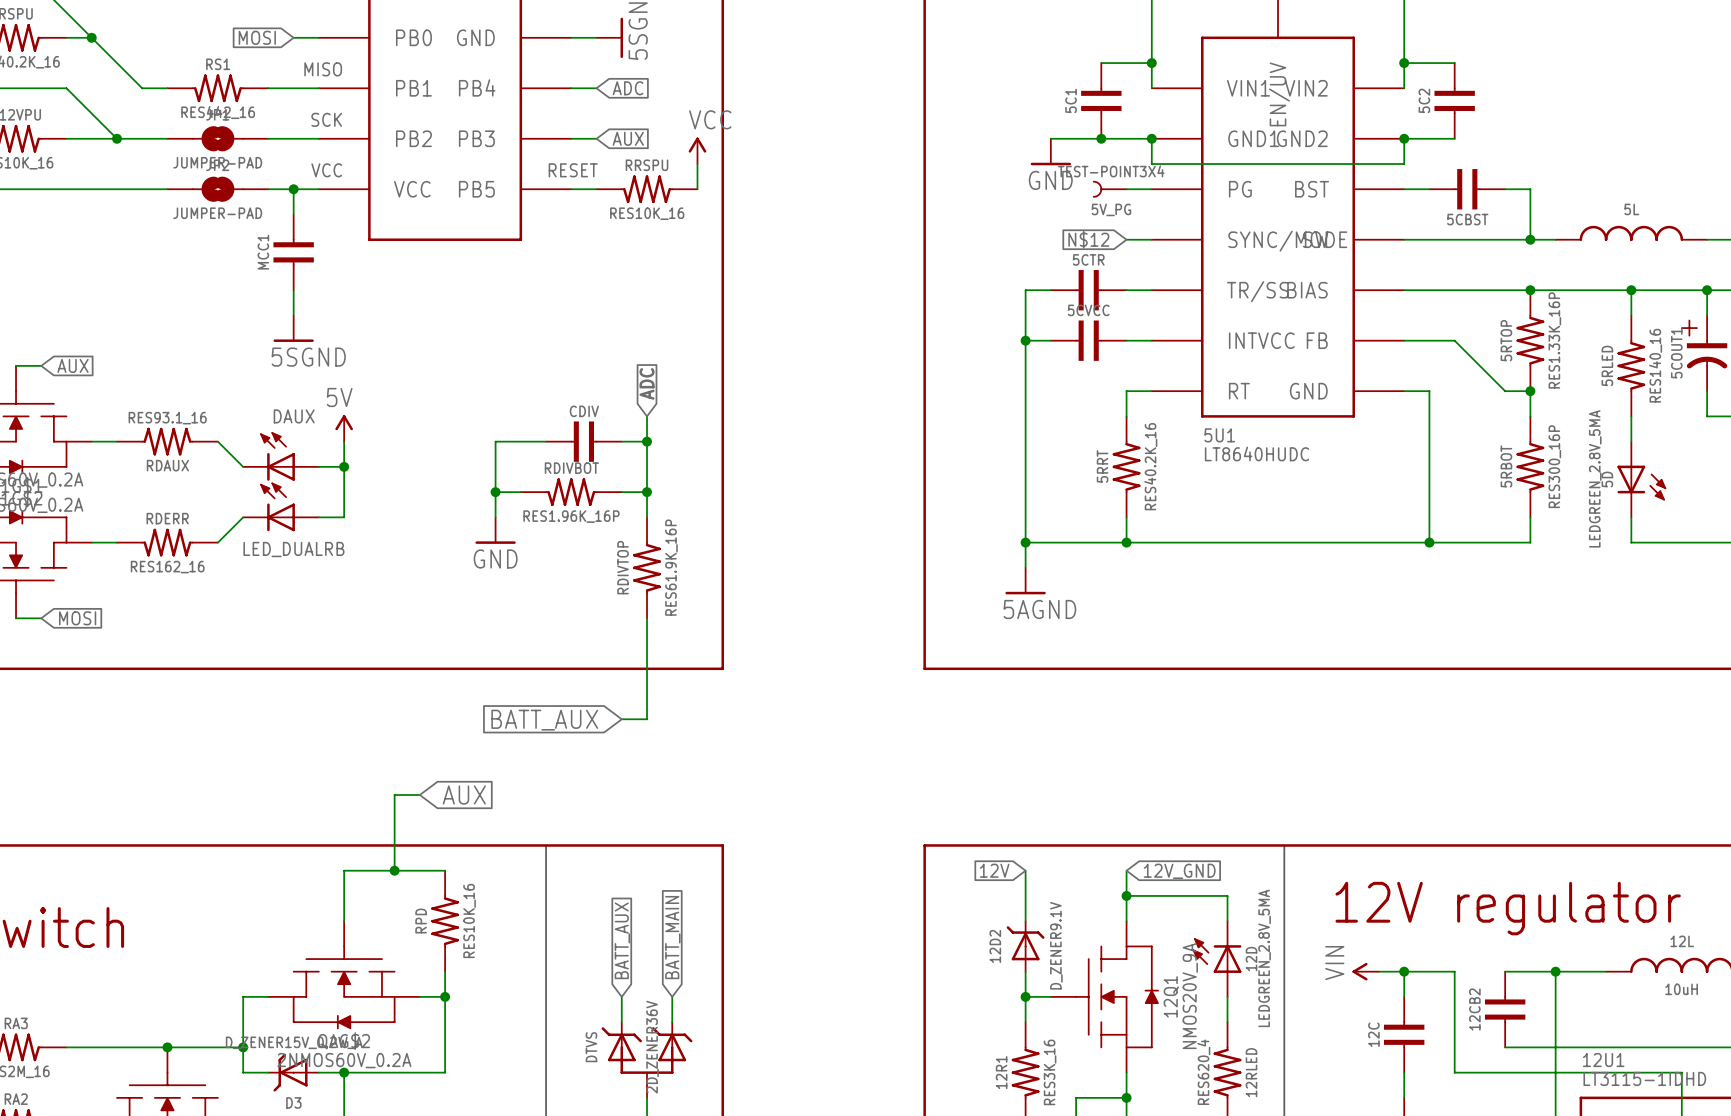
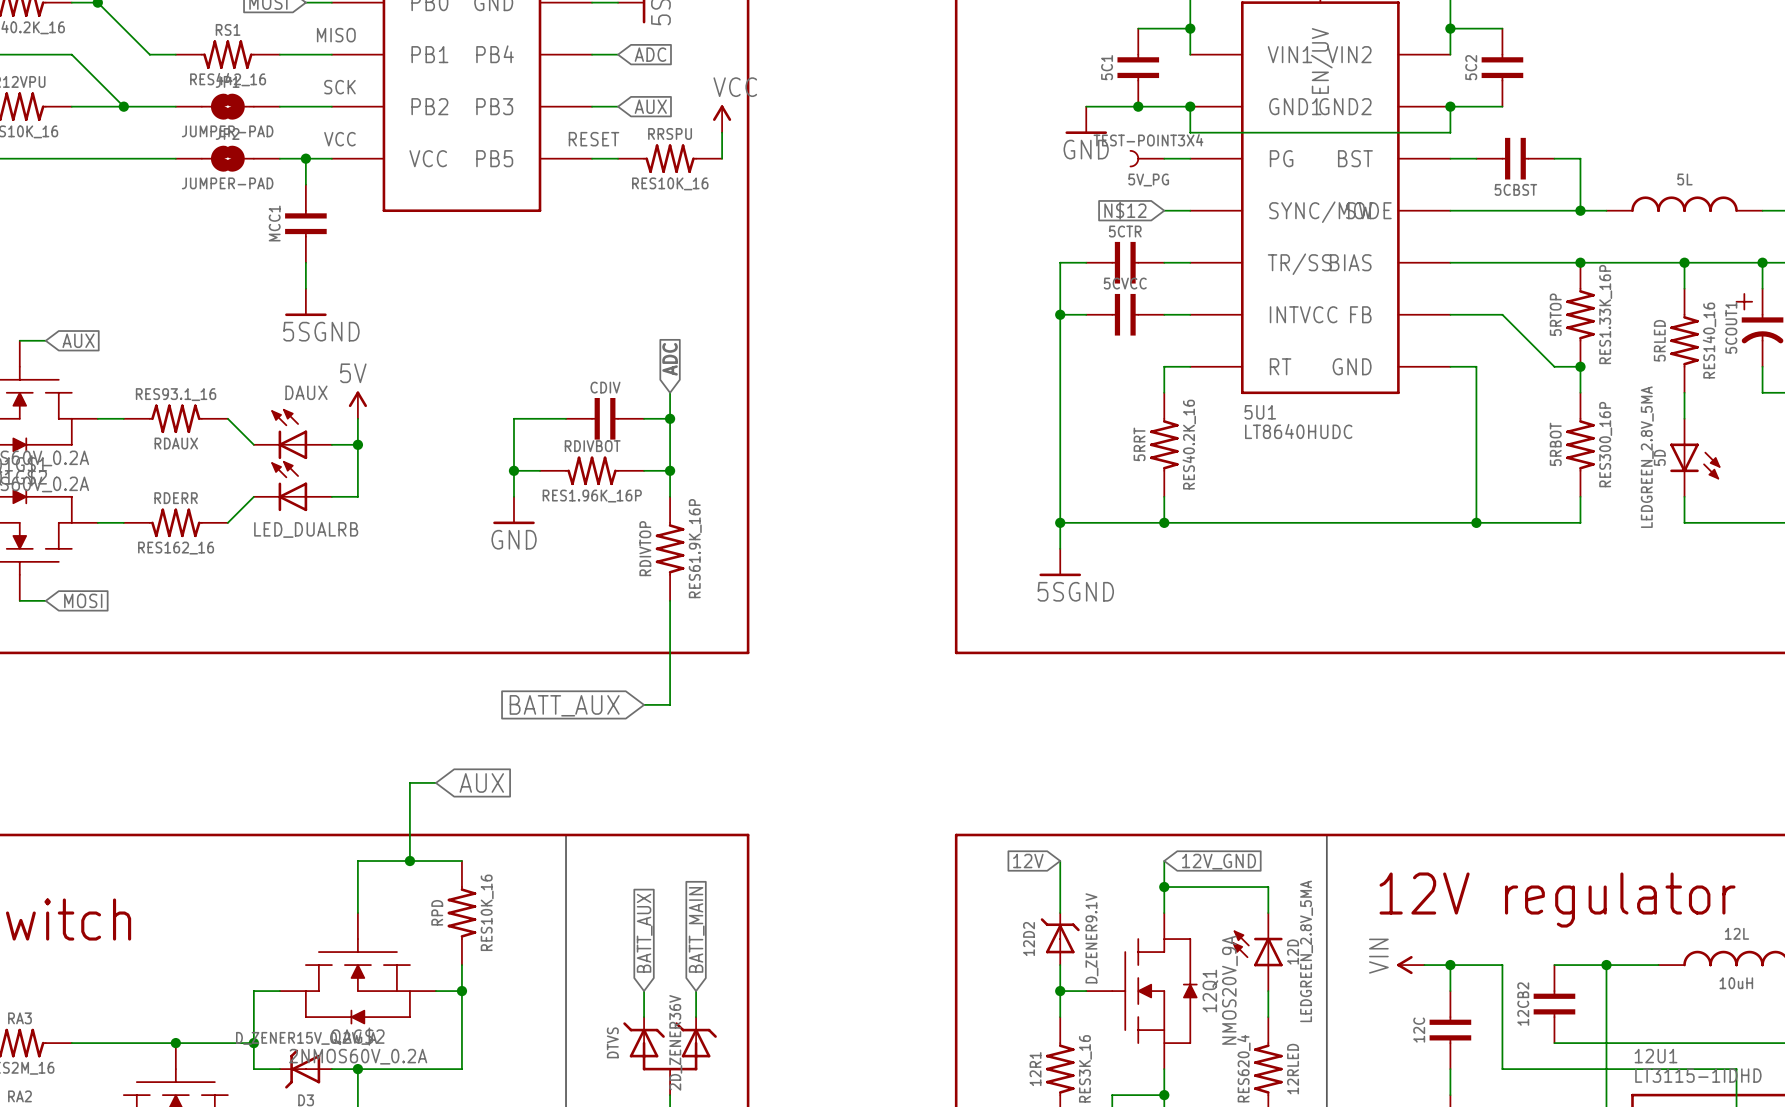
power symbol: 5AGND (1025, 581) -> 5SGND (1060, 562)

